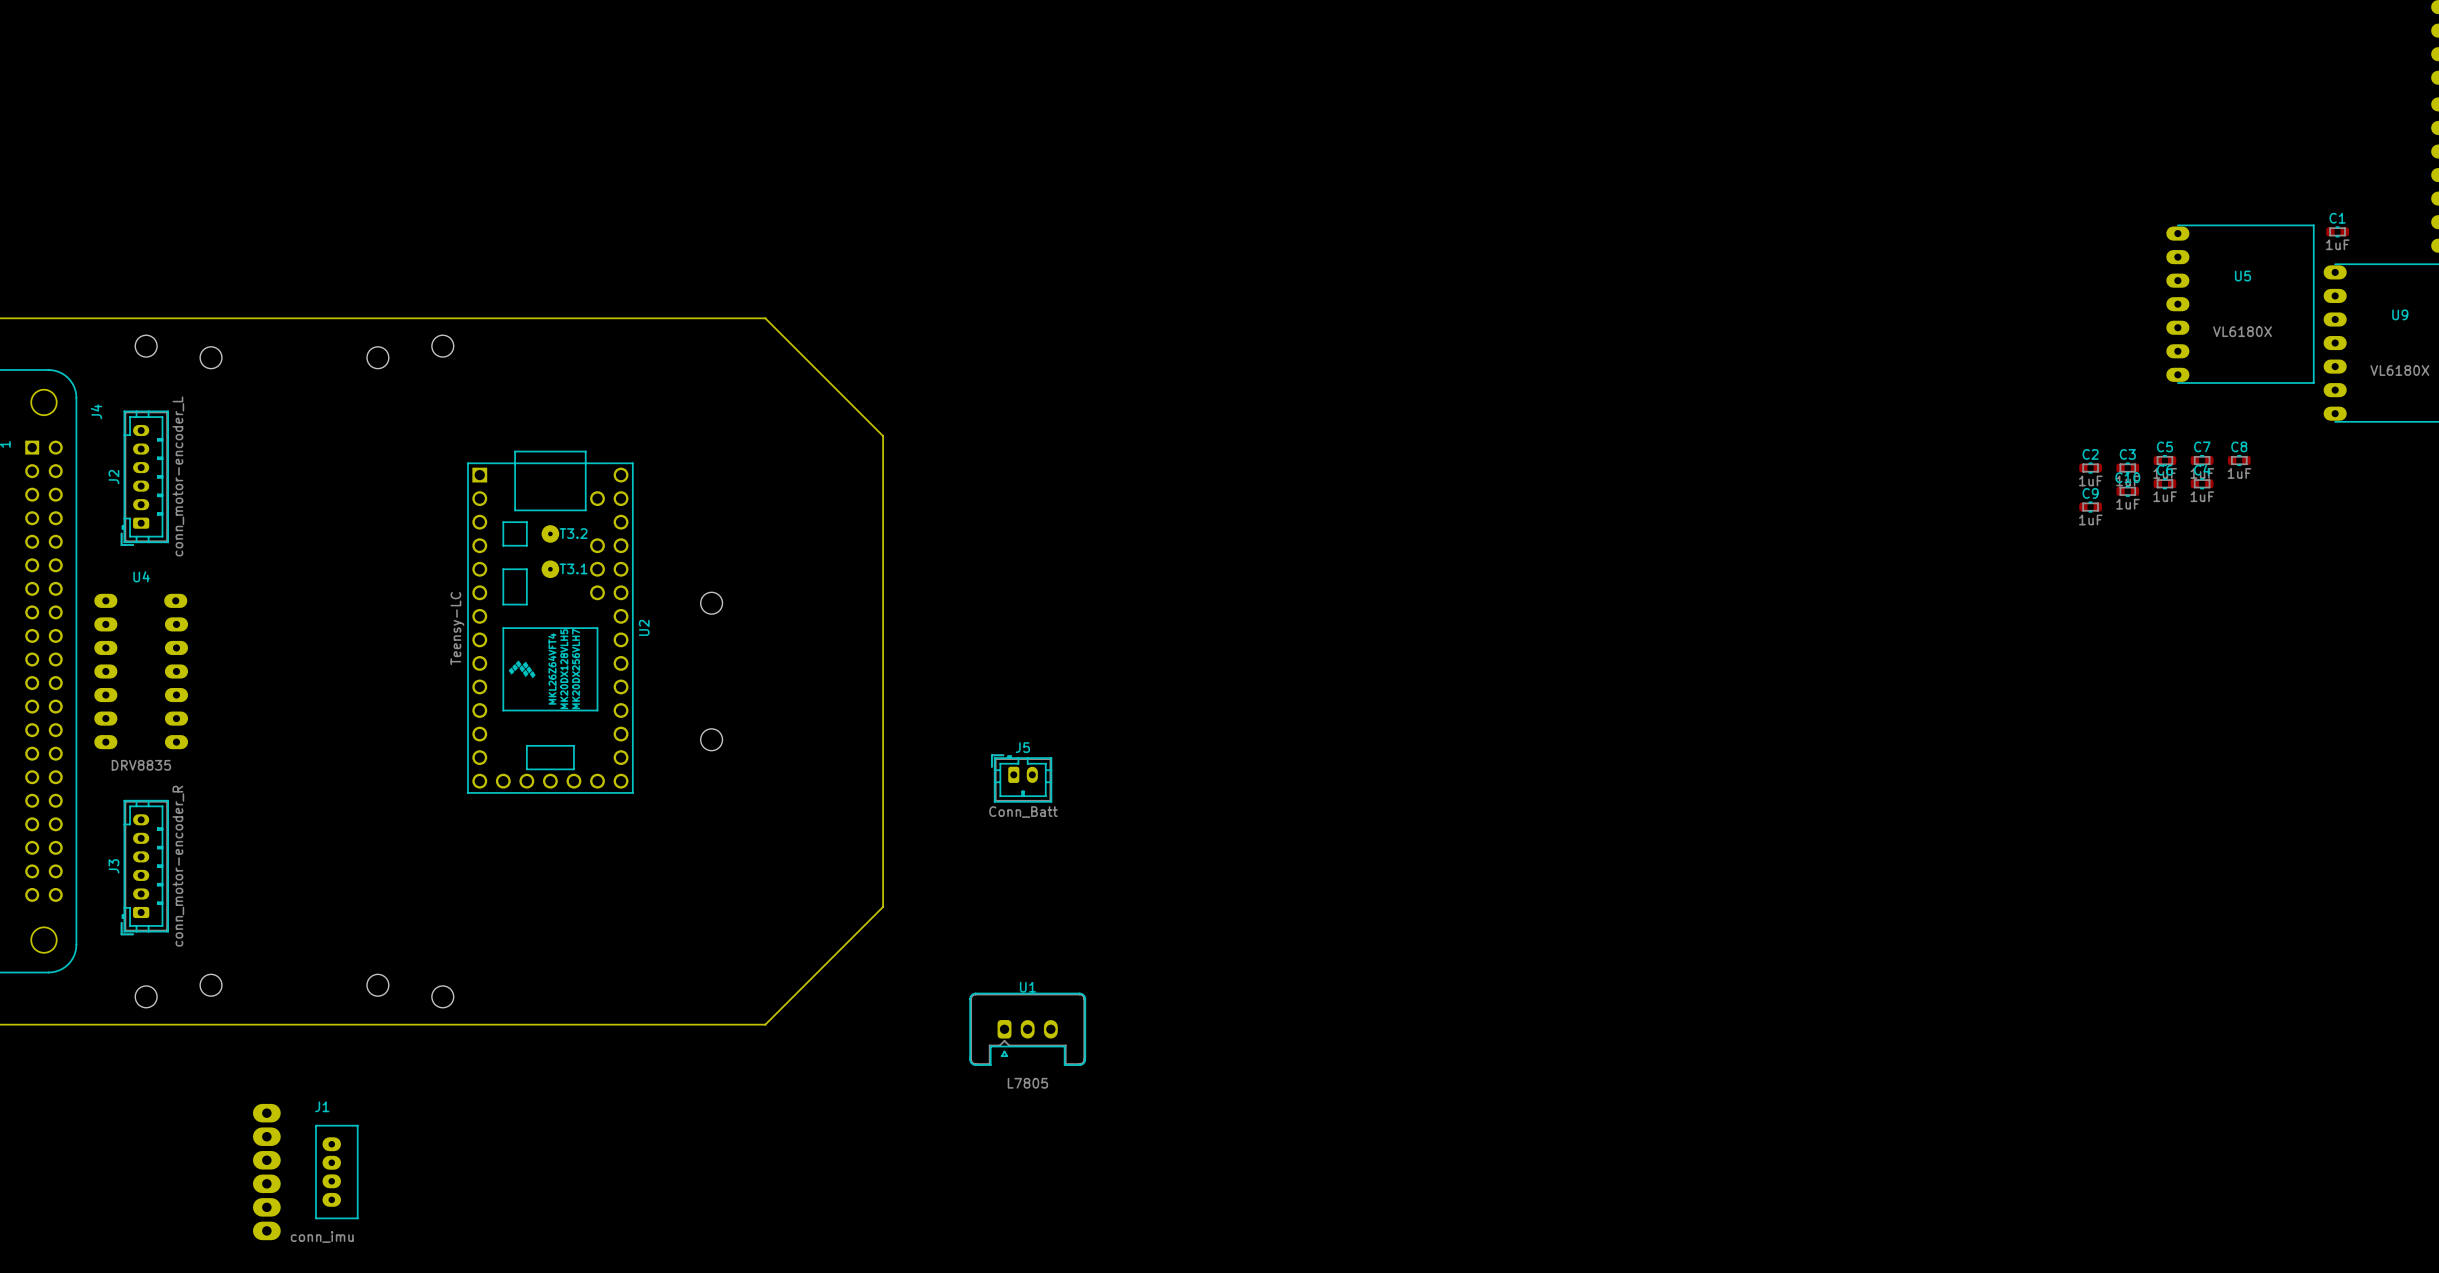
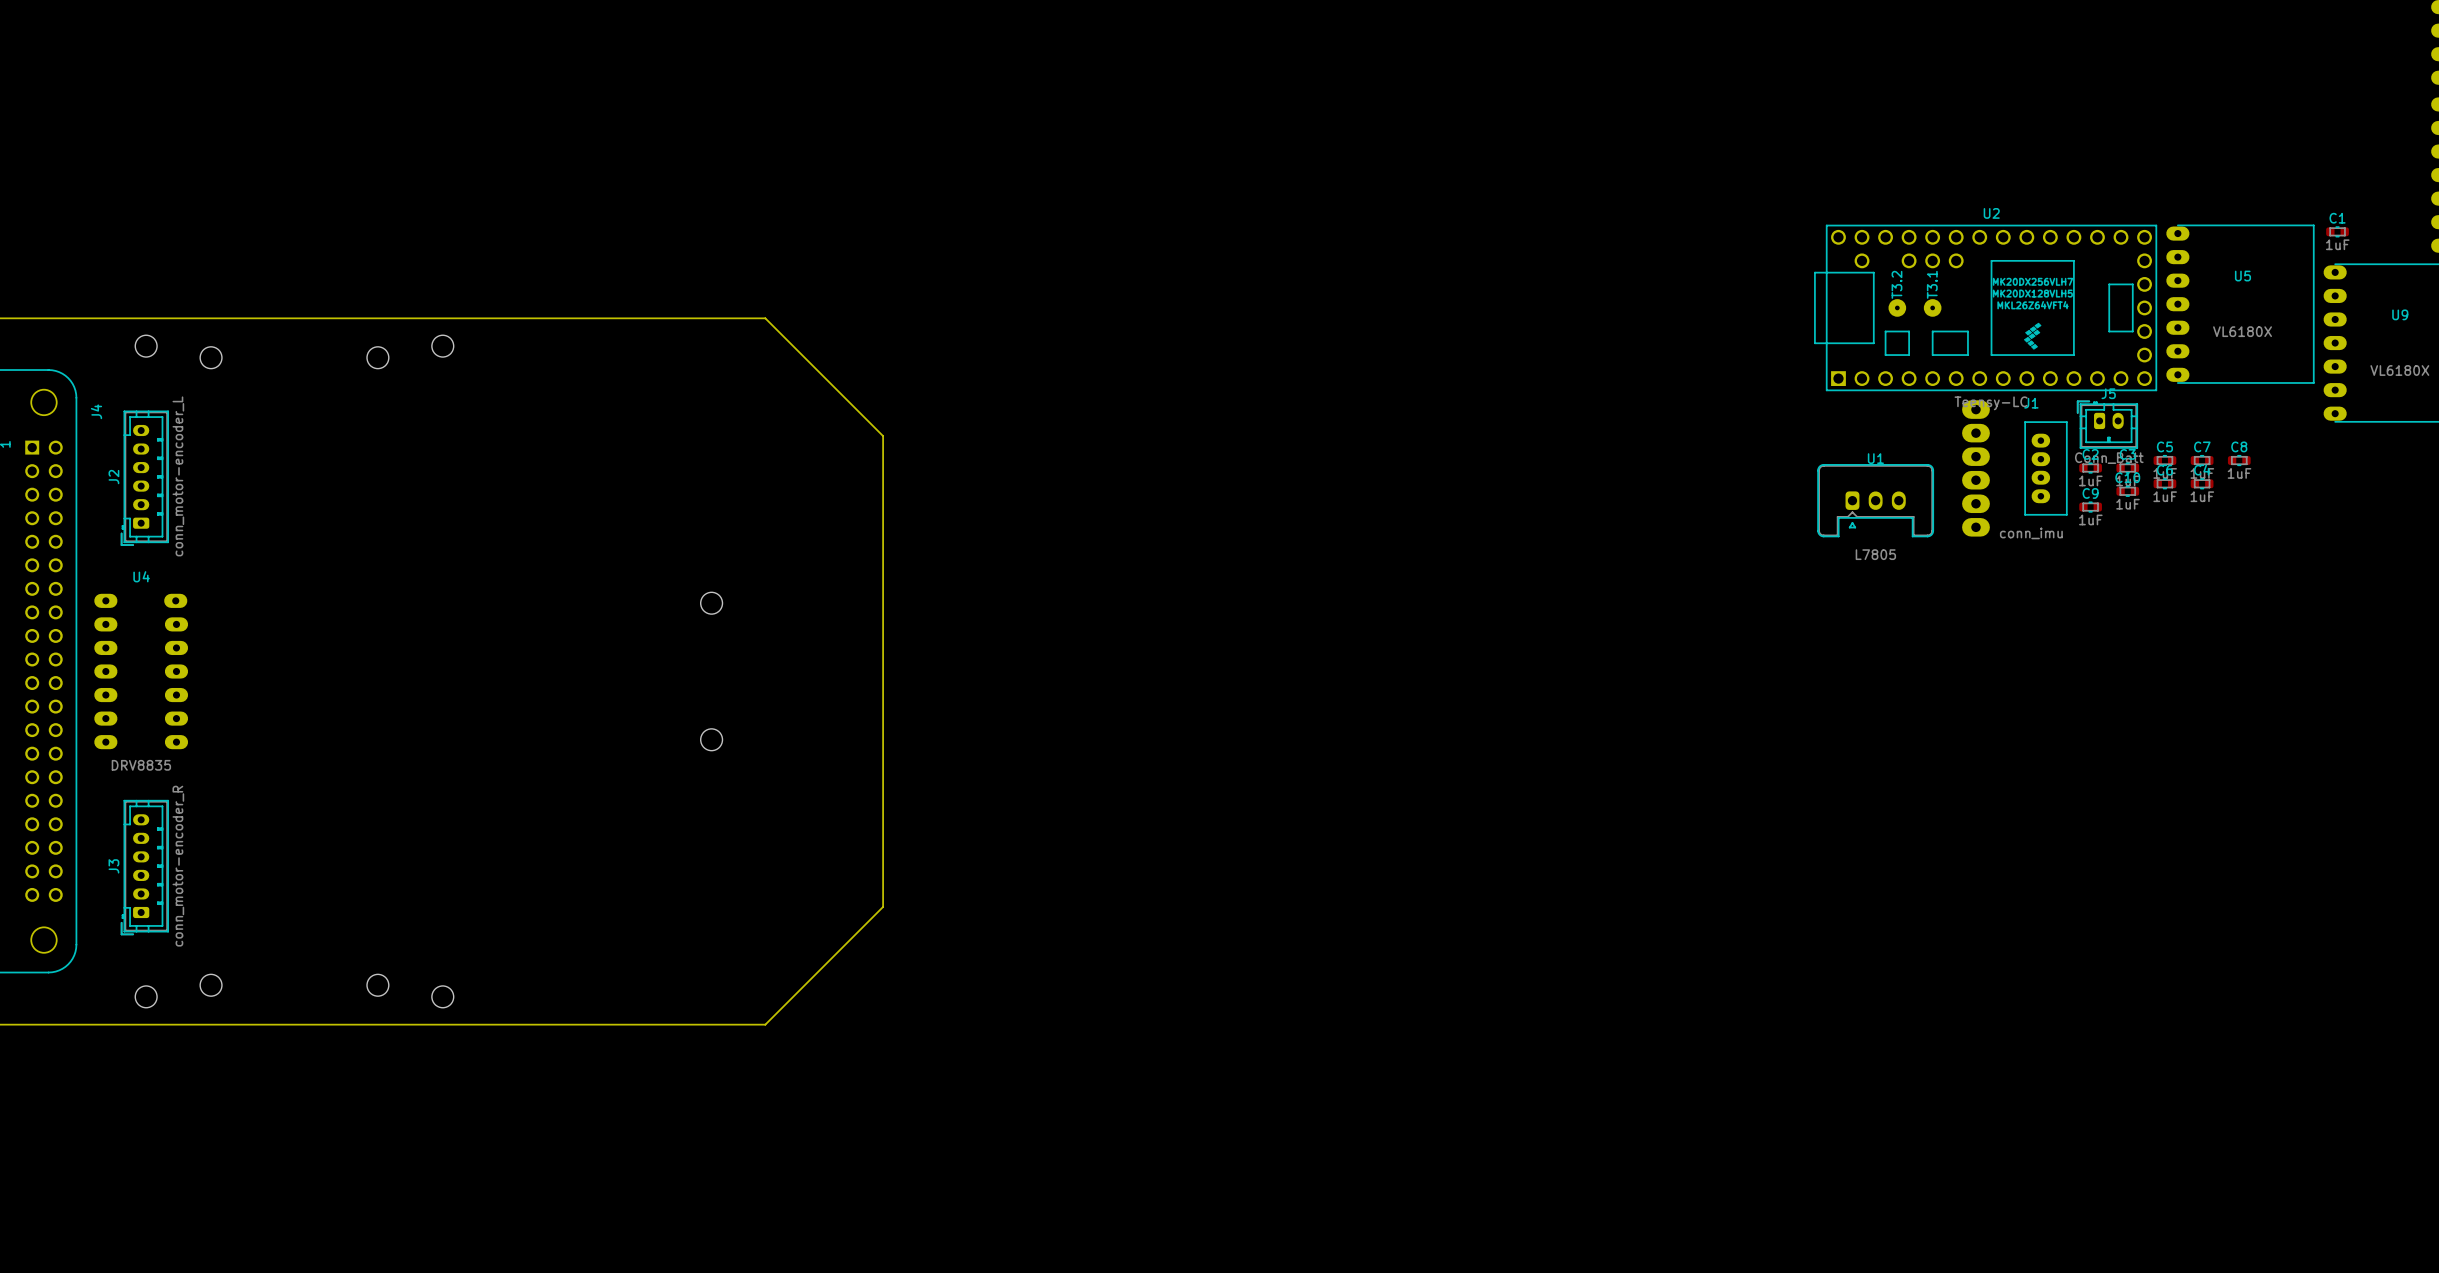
U2 rotation: 0° (550, 622) -> 90° counterclockwise (1985, 307)
U2 position: (550, 622) -> (1985, 307)
J5 position: (1021, 778) -> (2107, 424)
U1 position: (1027, 1029) -> (1875, 500)
J1 position: (305, 1172) -> (2014, 468)

